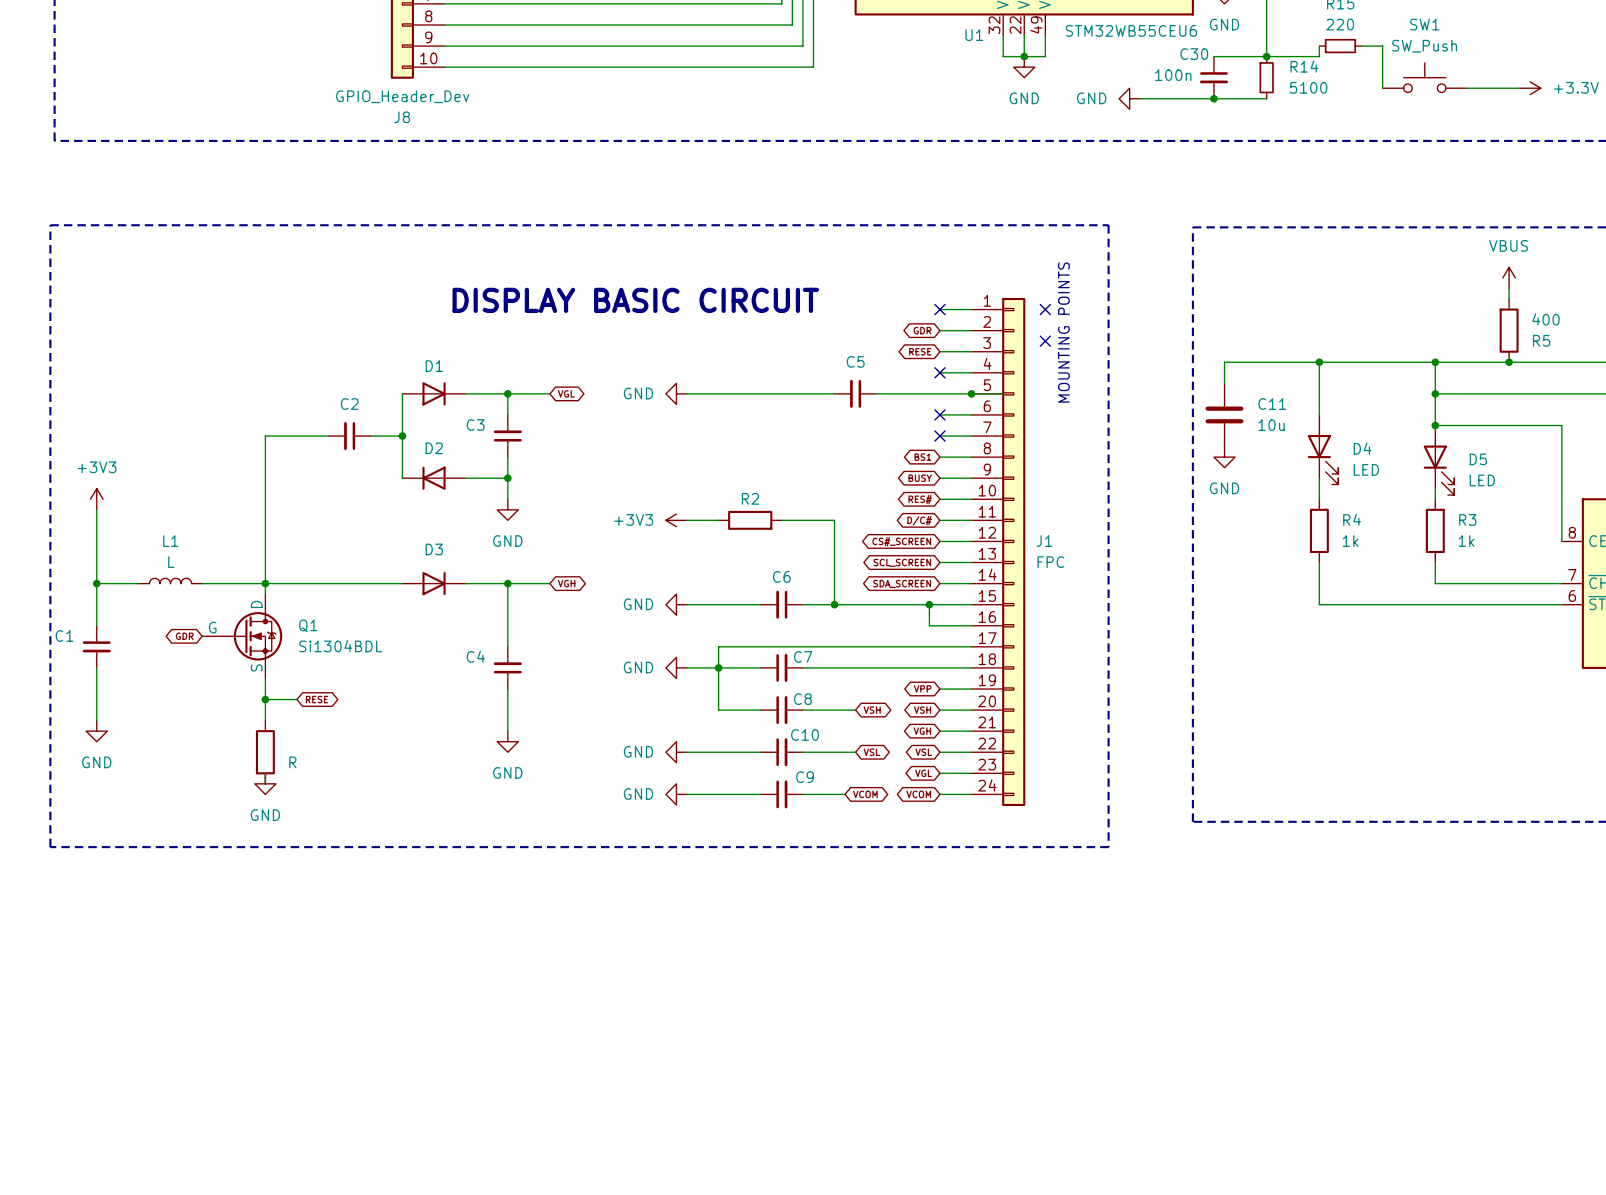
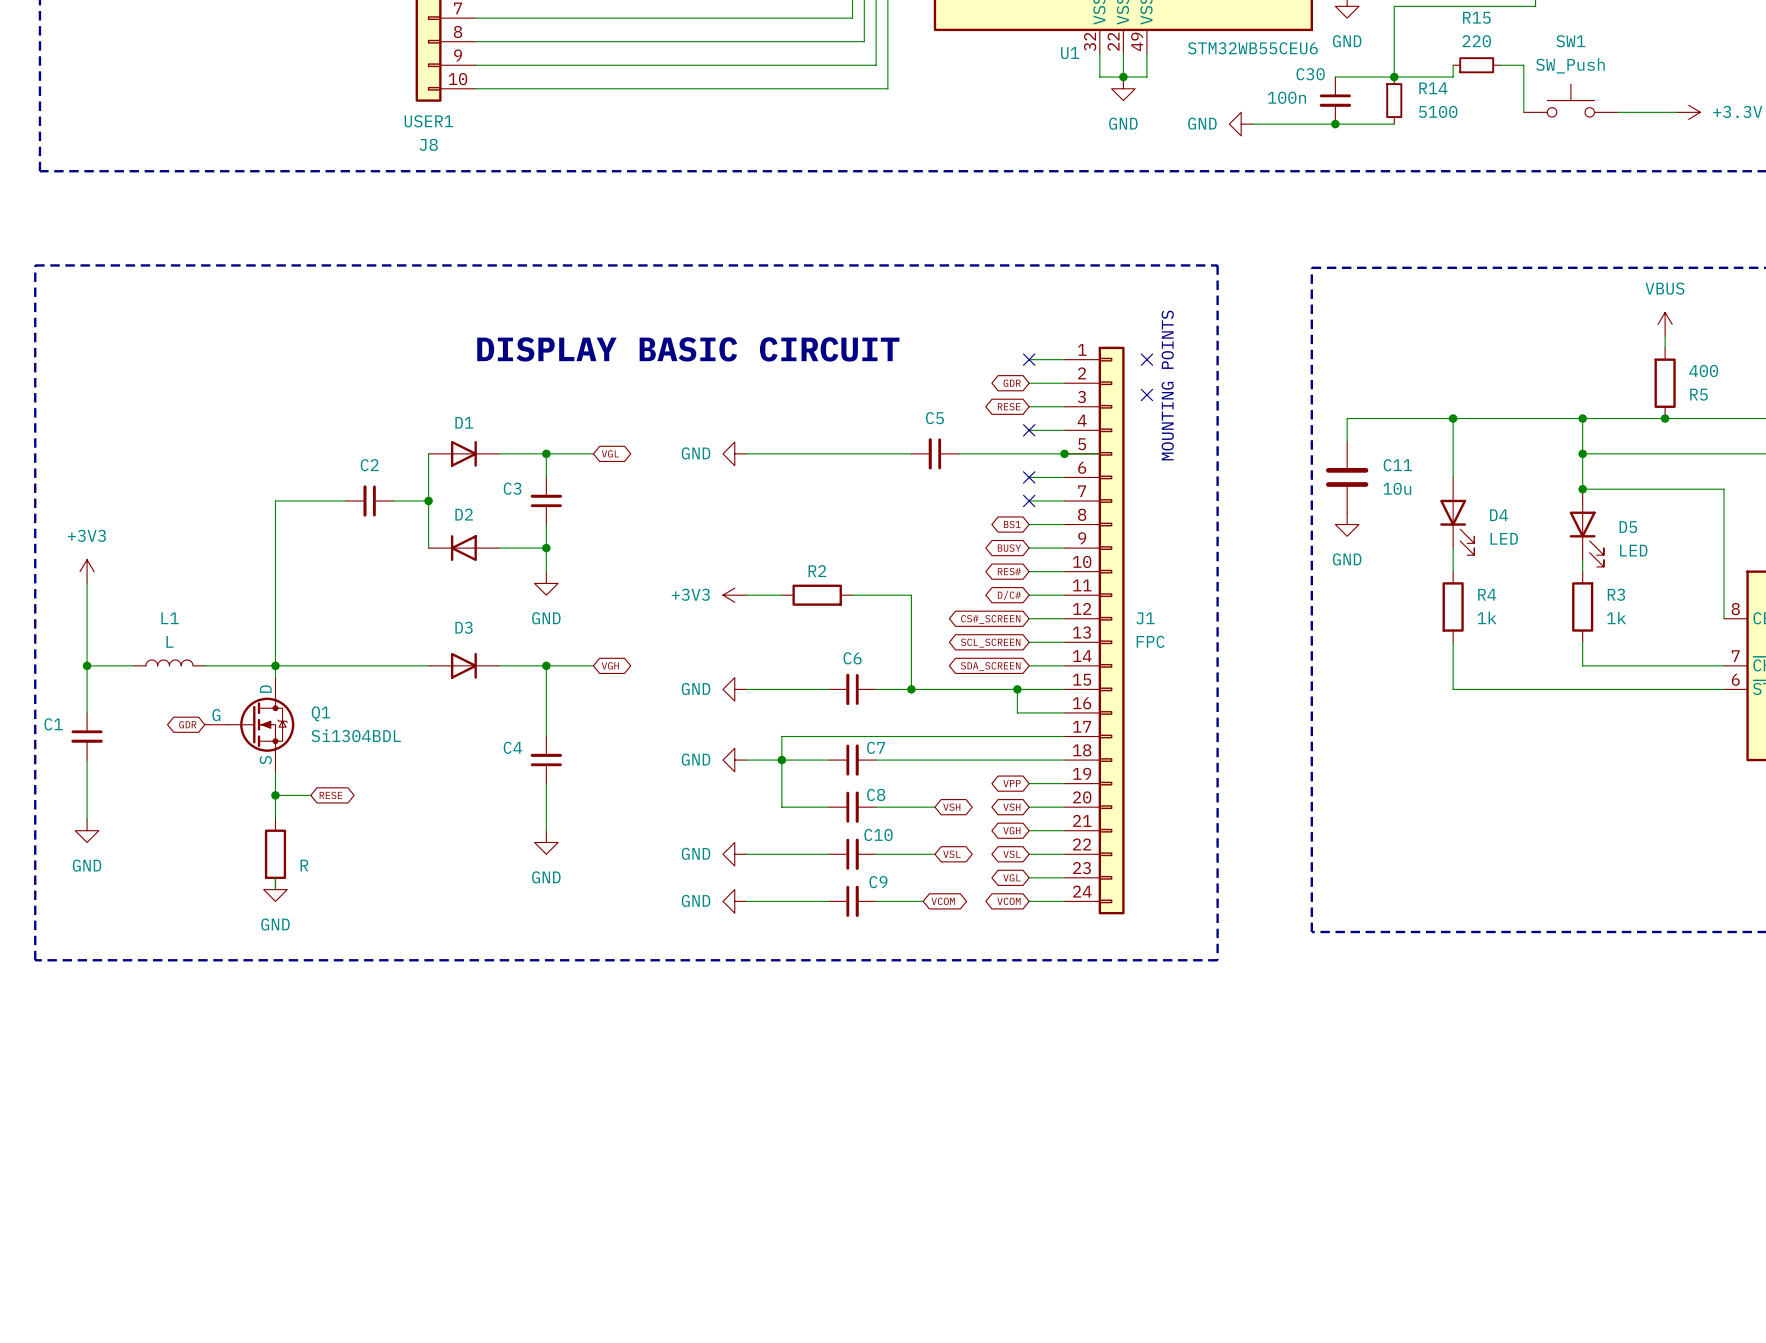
J8 value: GPIO_Header_Dev (402, 96) -> USER1 (428, 121)

